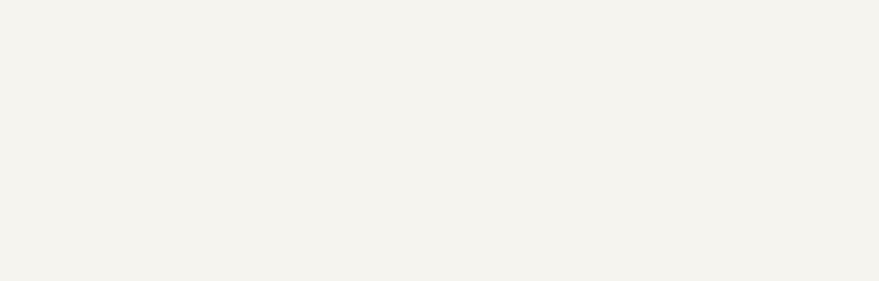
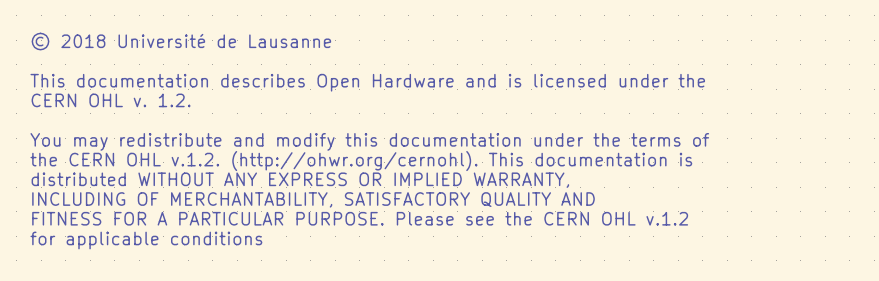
text: none -> © 2018 Université de Lausanne (181, 41)
text: none -> This documentation describes Open Hardware and is licensed under the (367, 82)
text: none -> CERN OHL v. 1.2. (111, 100)
text: none -> You may redistribute and modify this documentation under the terms of (369, 141)
text: none -> the CERN OHL v.1.2. (http://ohwr.org/cernohl). This documentation is (361, 161)
text: none -> distributed WITHOUT ANY EXPRESS OR IMPLIED WARRANTY, (300, 180)
text: none -> INCLUDING OF MERCHANTABILITY, SATISFACTORY QUALITY AND (313, 199)
text: none -> FITNESS FOR A PARTICULAR PURPOSE. Please see the CERN OHL v.1.2 (360, 218)
text: none -> for applicable conditions (146, 240)

